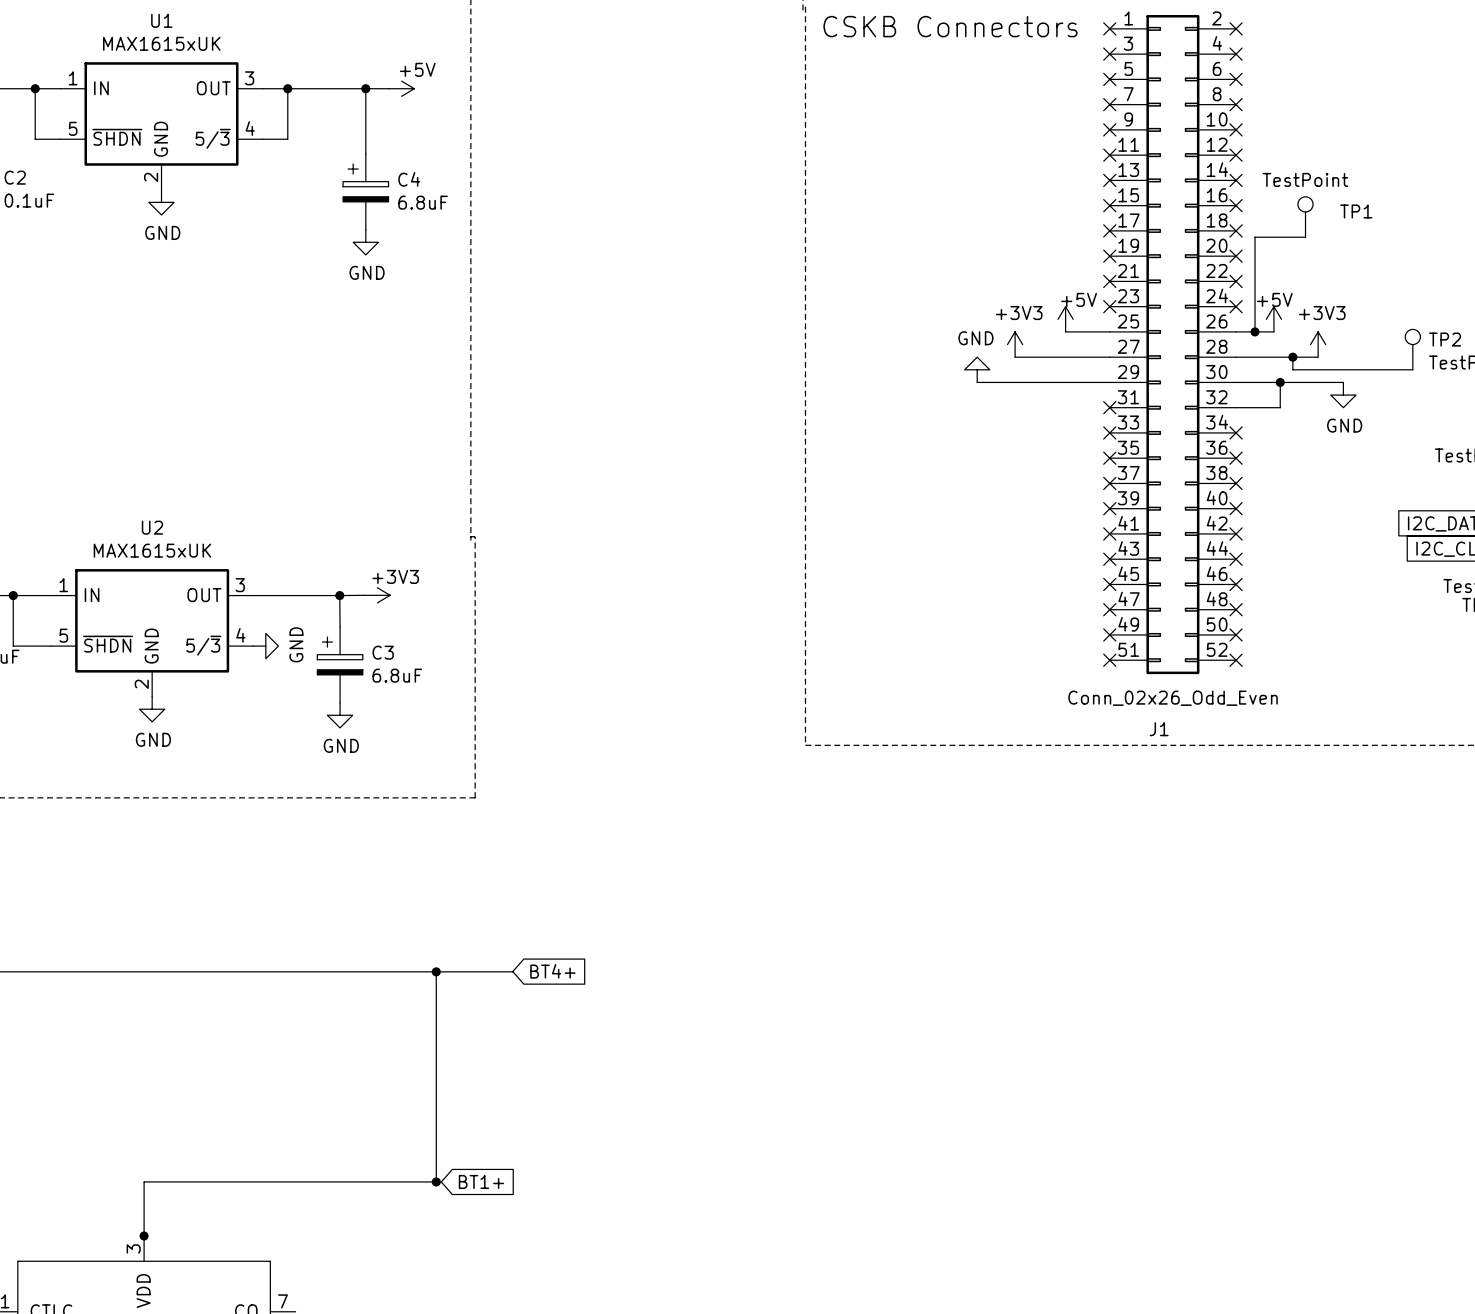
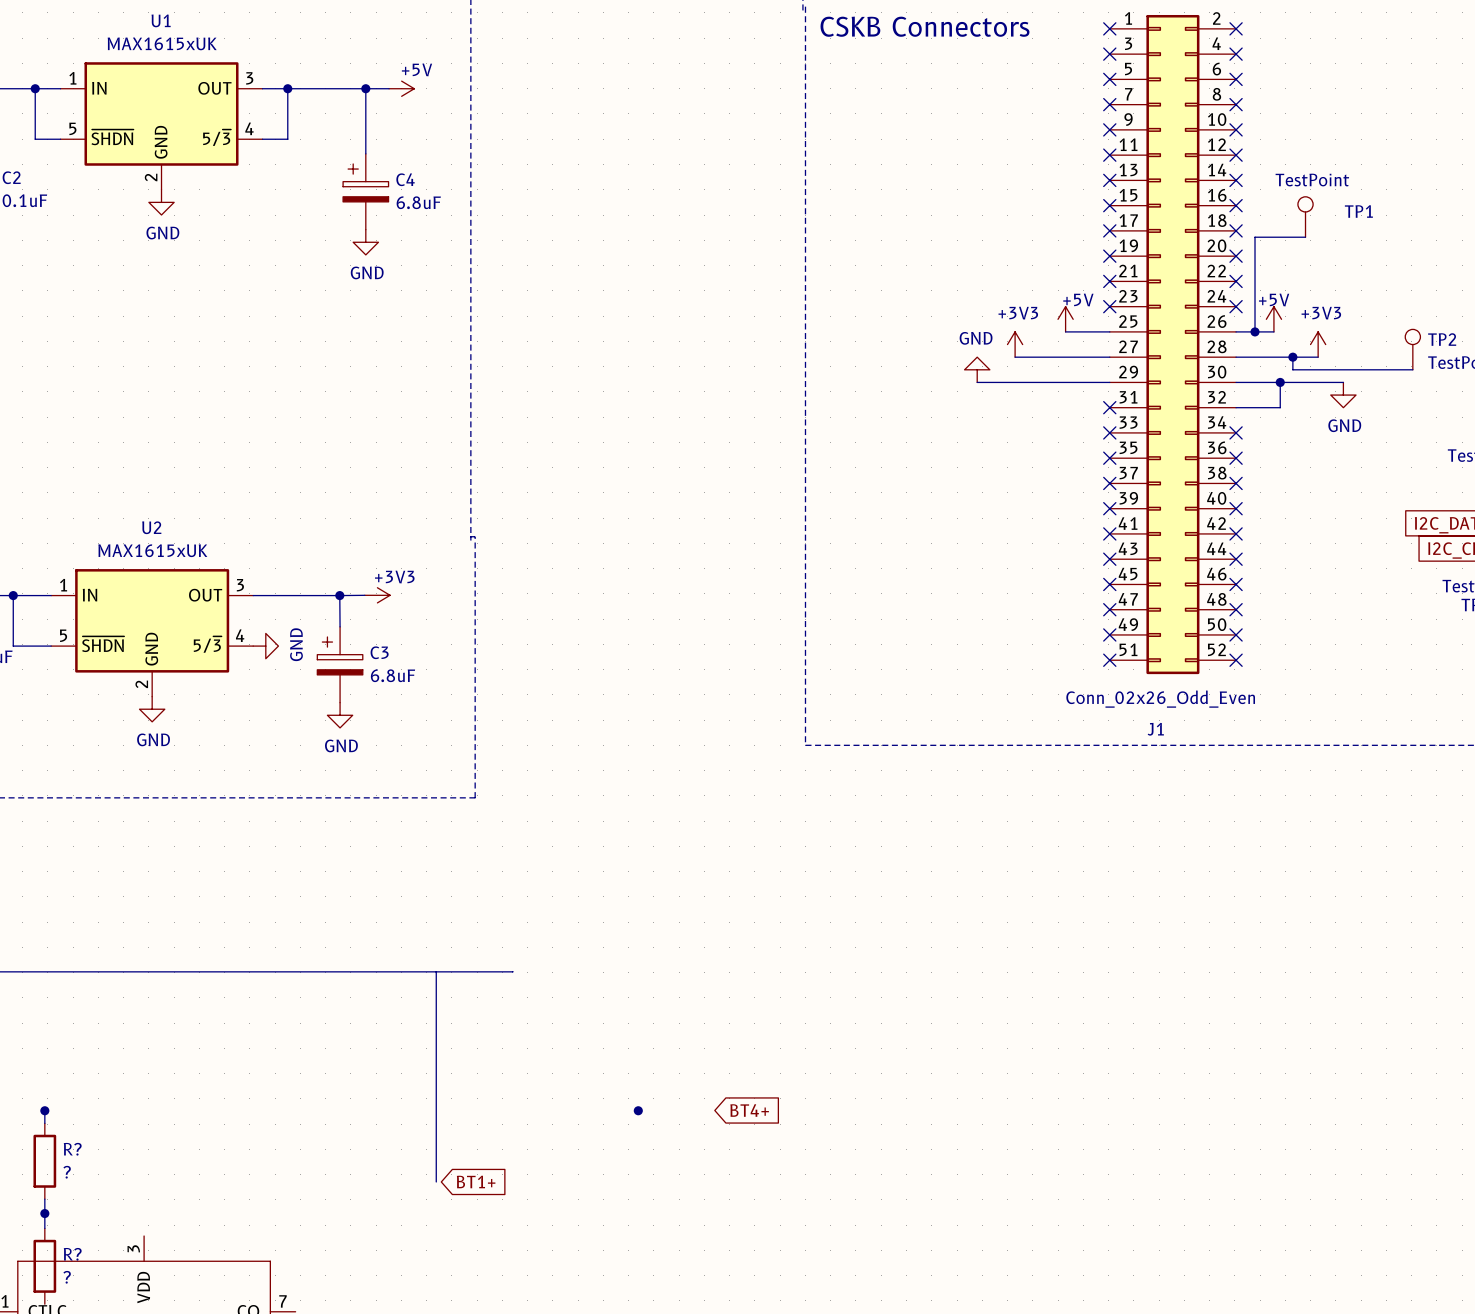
junction: (436, 971) -> none
global label position: BT4+ (552, 971) -> BT4+ (749, 1110)
wire: none -> (44, 1110) (44, 1123)
junction: none -> (44, 1110)
junction: none -> (638, 1110)
R?: none -> ? (44, 1161)
junction: (436, 1181) -> none
wire: (441, 1181) (144, 1181) (144, 1236) -> none
wire: none -> (44, 1199) (44, 1228)
junction: none -> (44, 1213)
junction: (144, 1236) -> none
R?: none -> ? (44, 1266)

